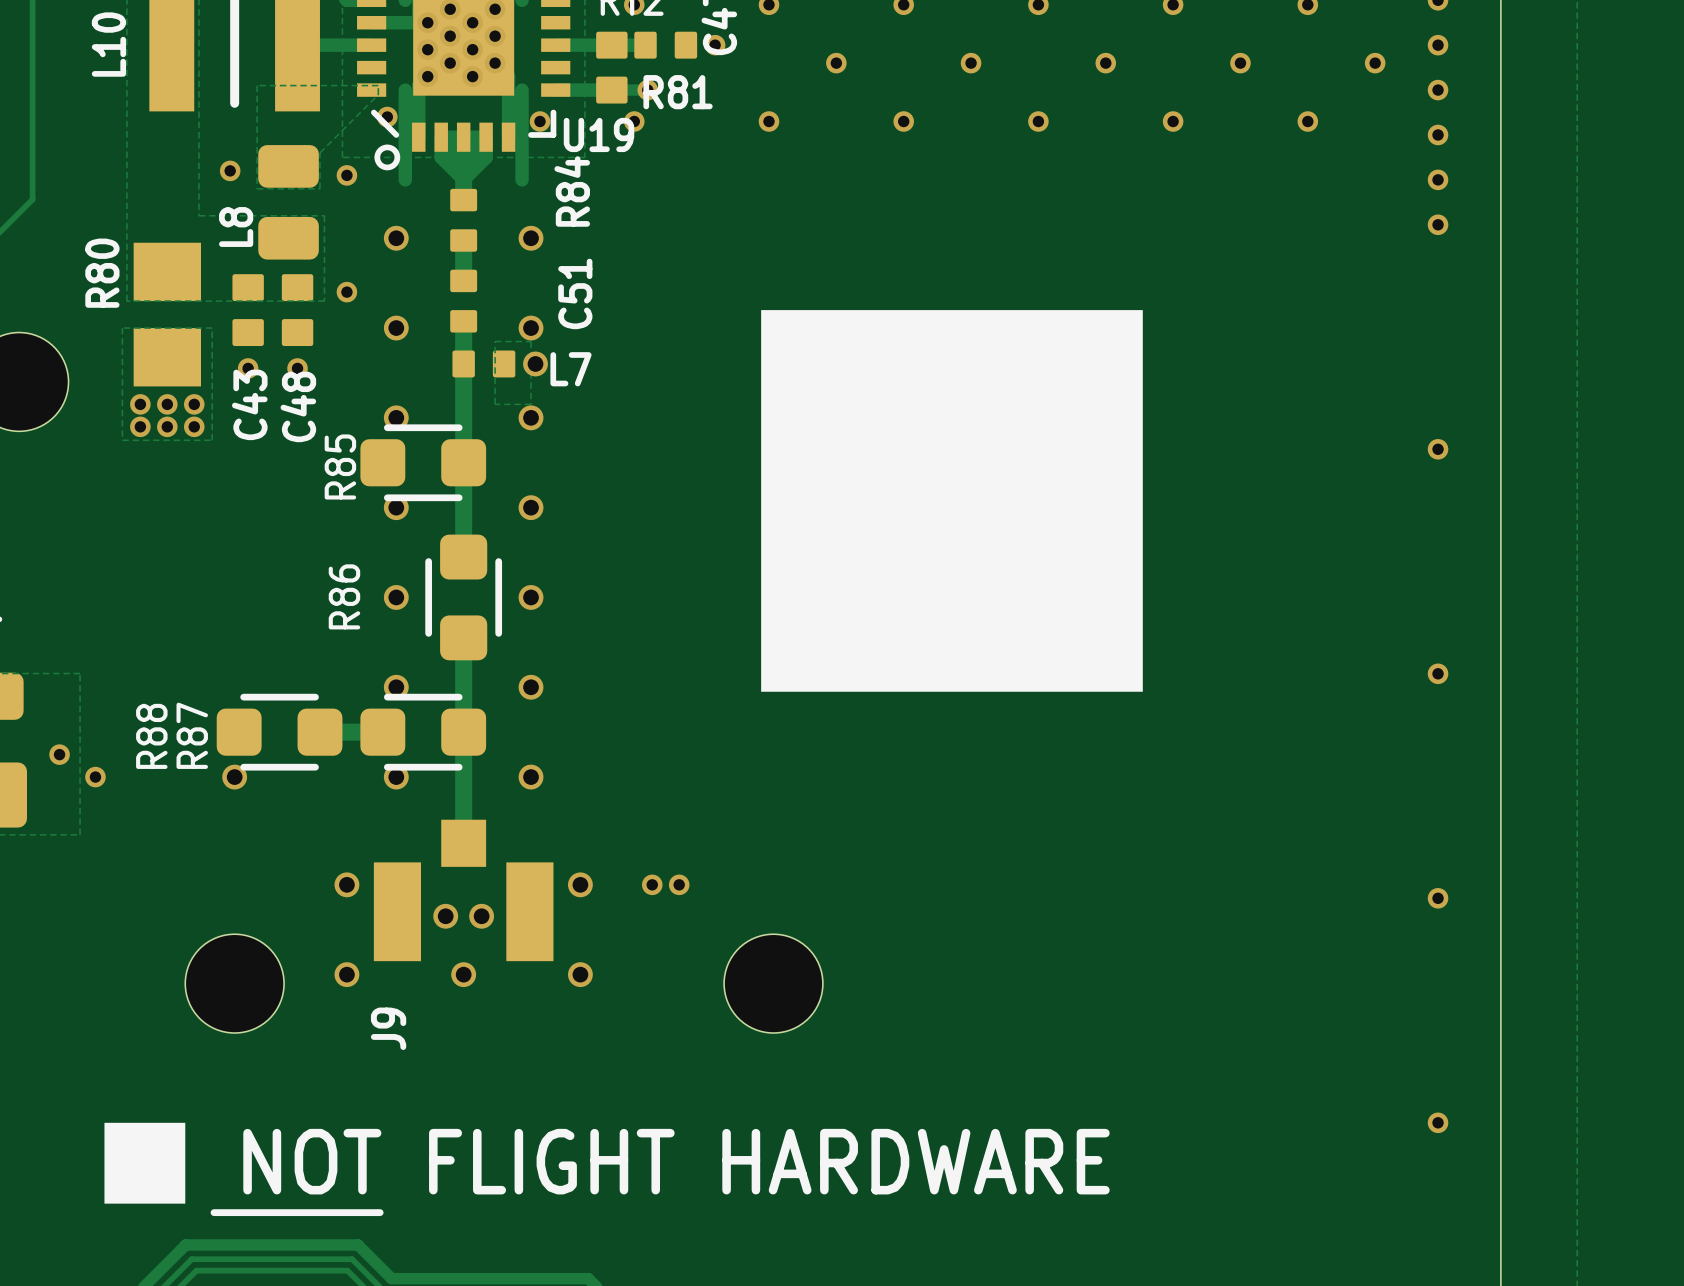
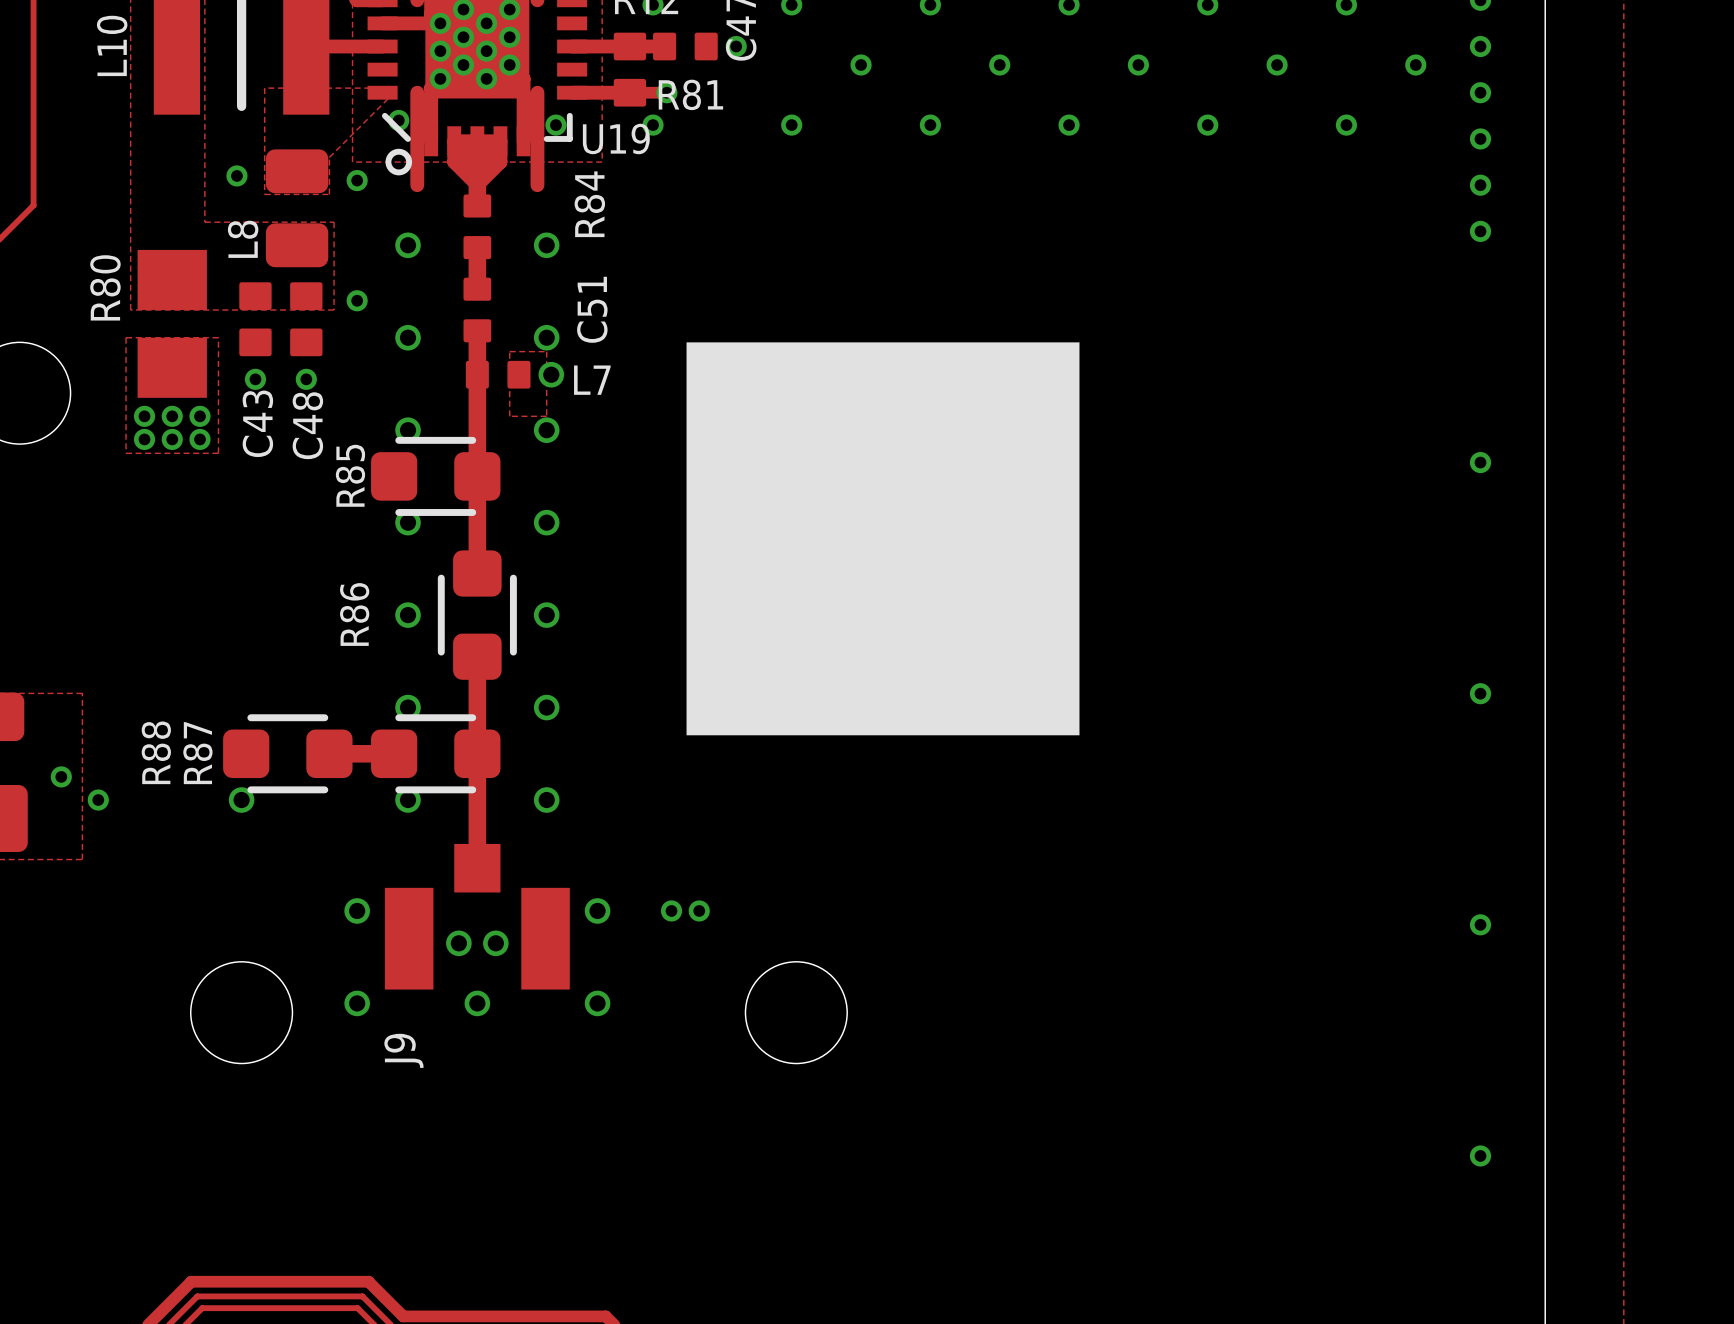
drawing position: (951, 500) -> (883, 538)
drawing: [104, 1122, 384, 1217] -> none

